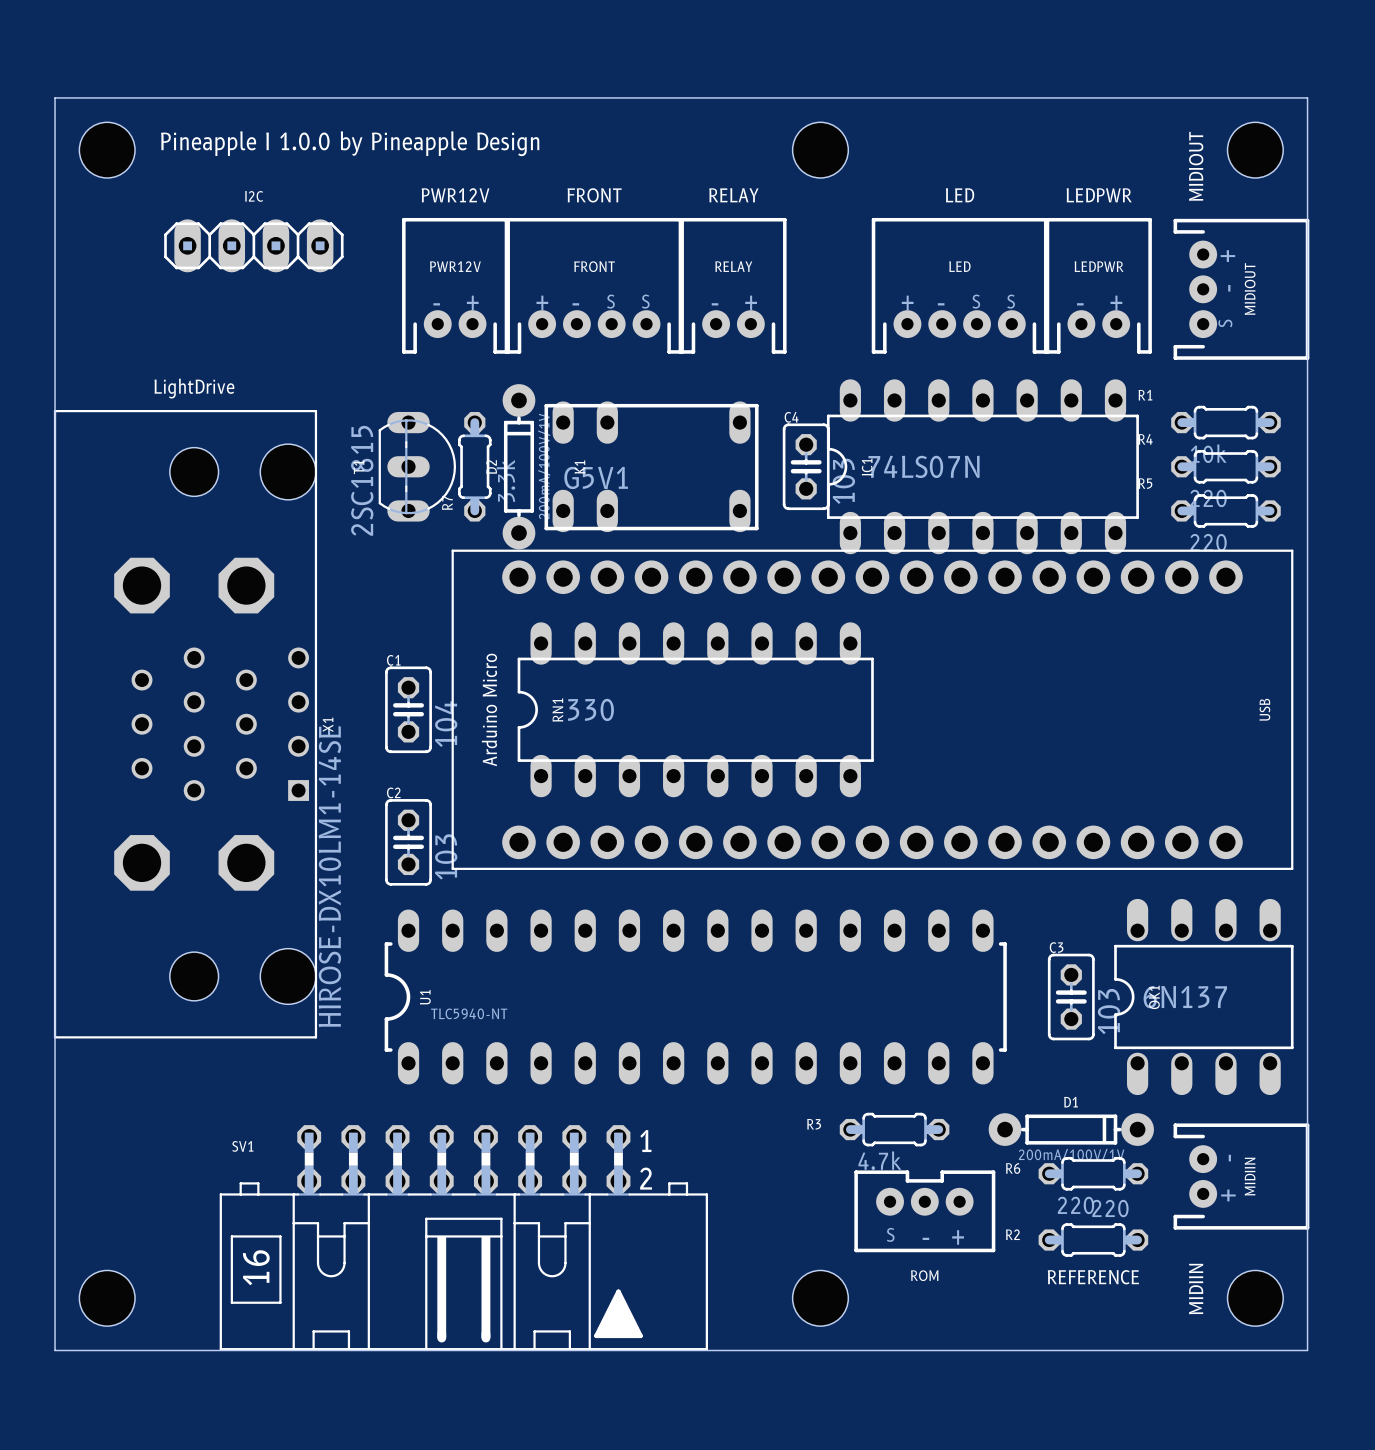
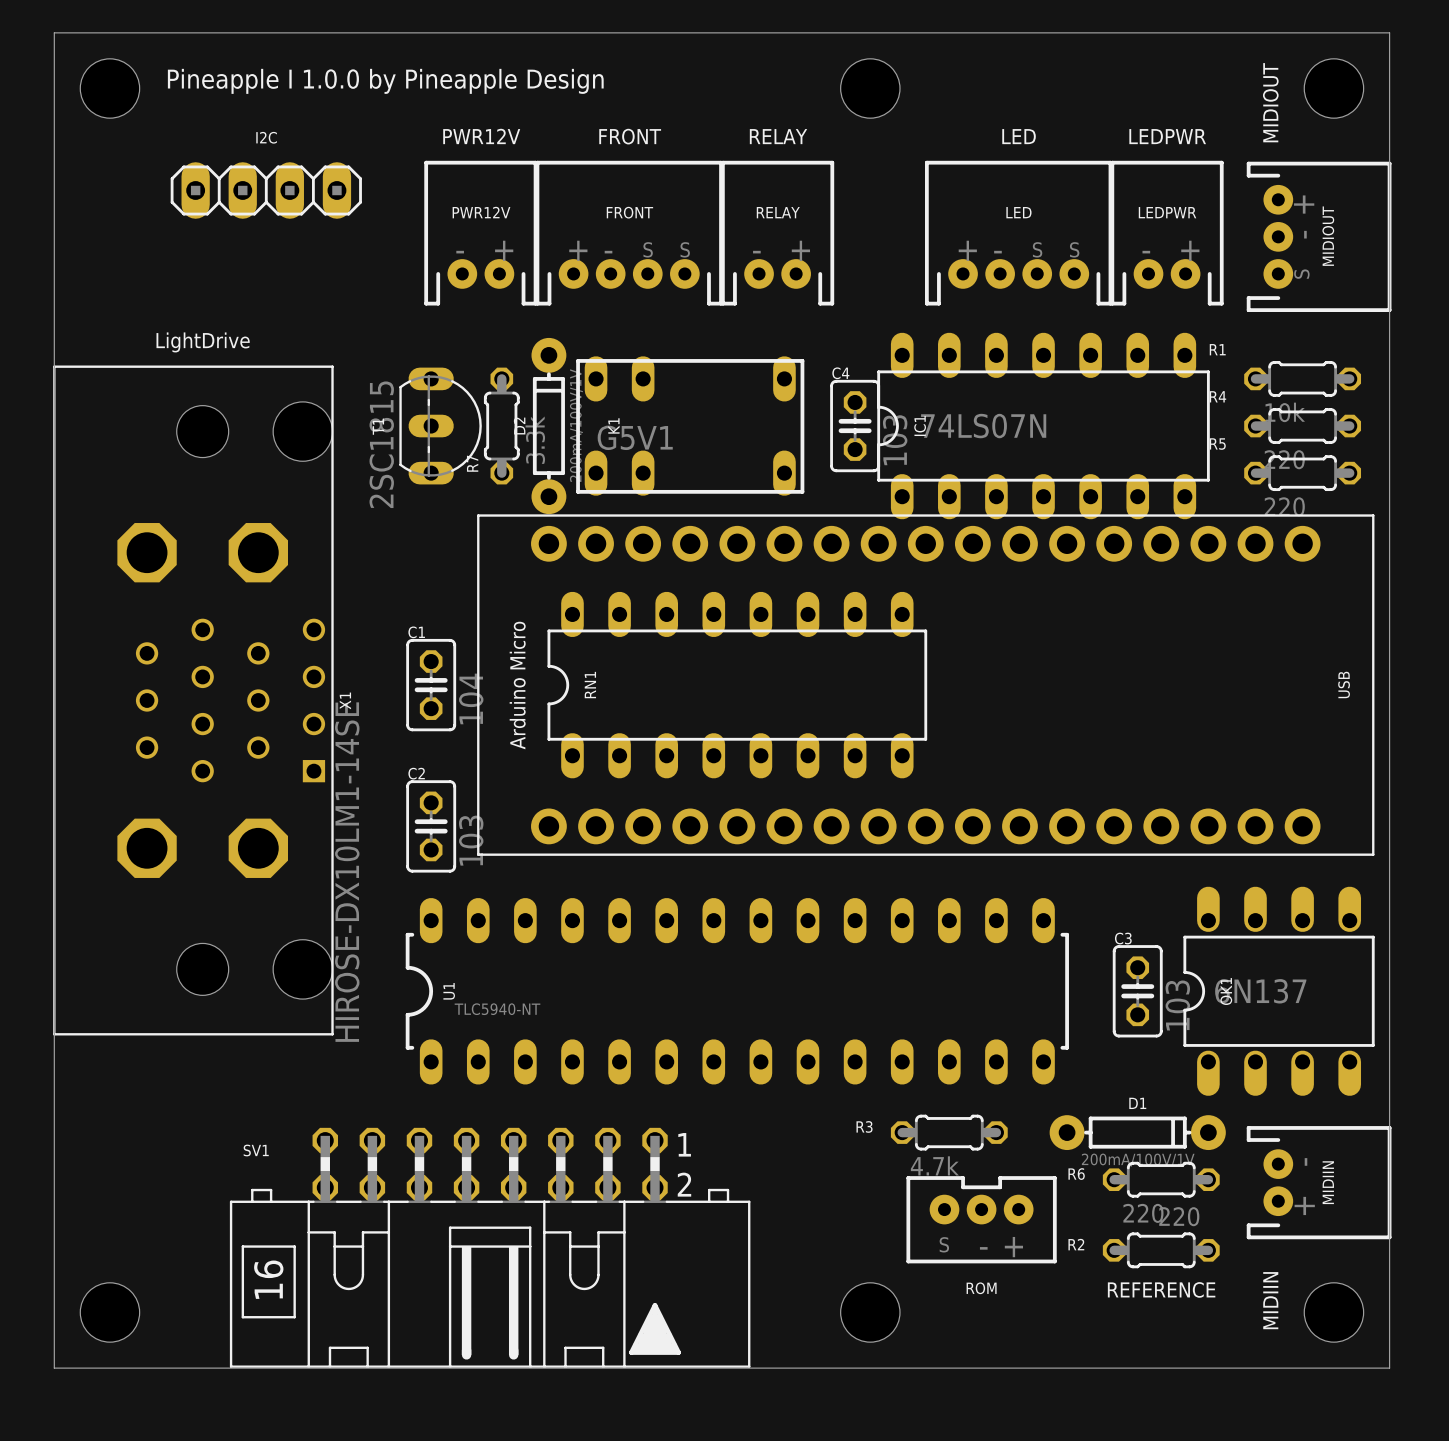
RN1 value: 330 (590, 709) -> none

